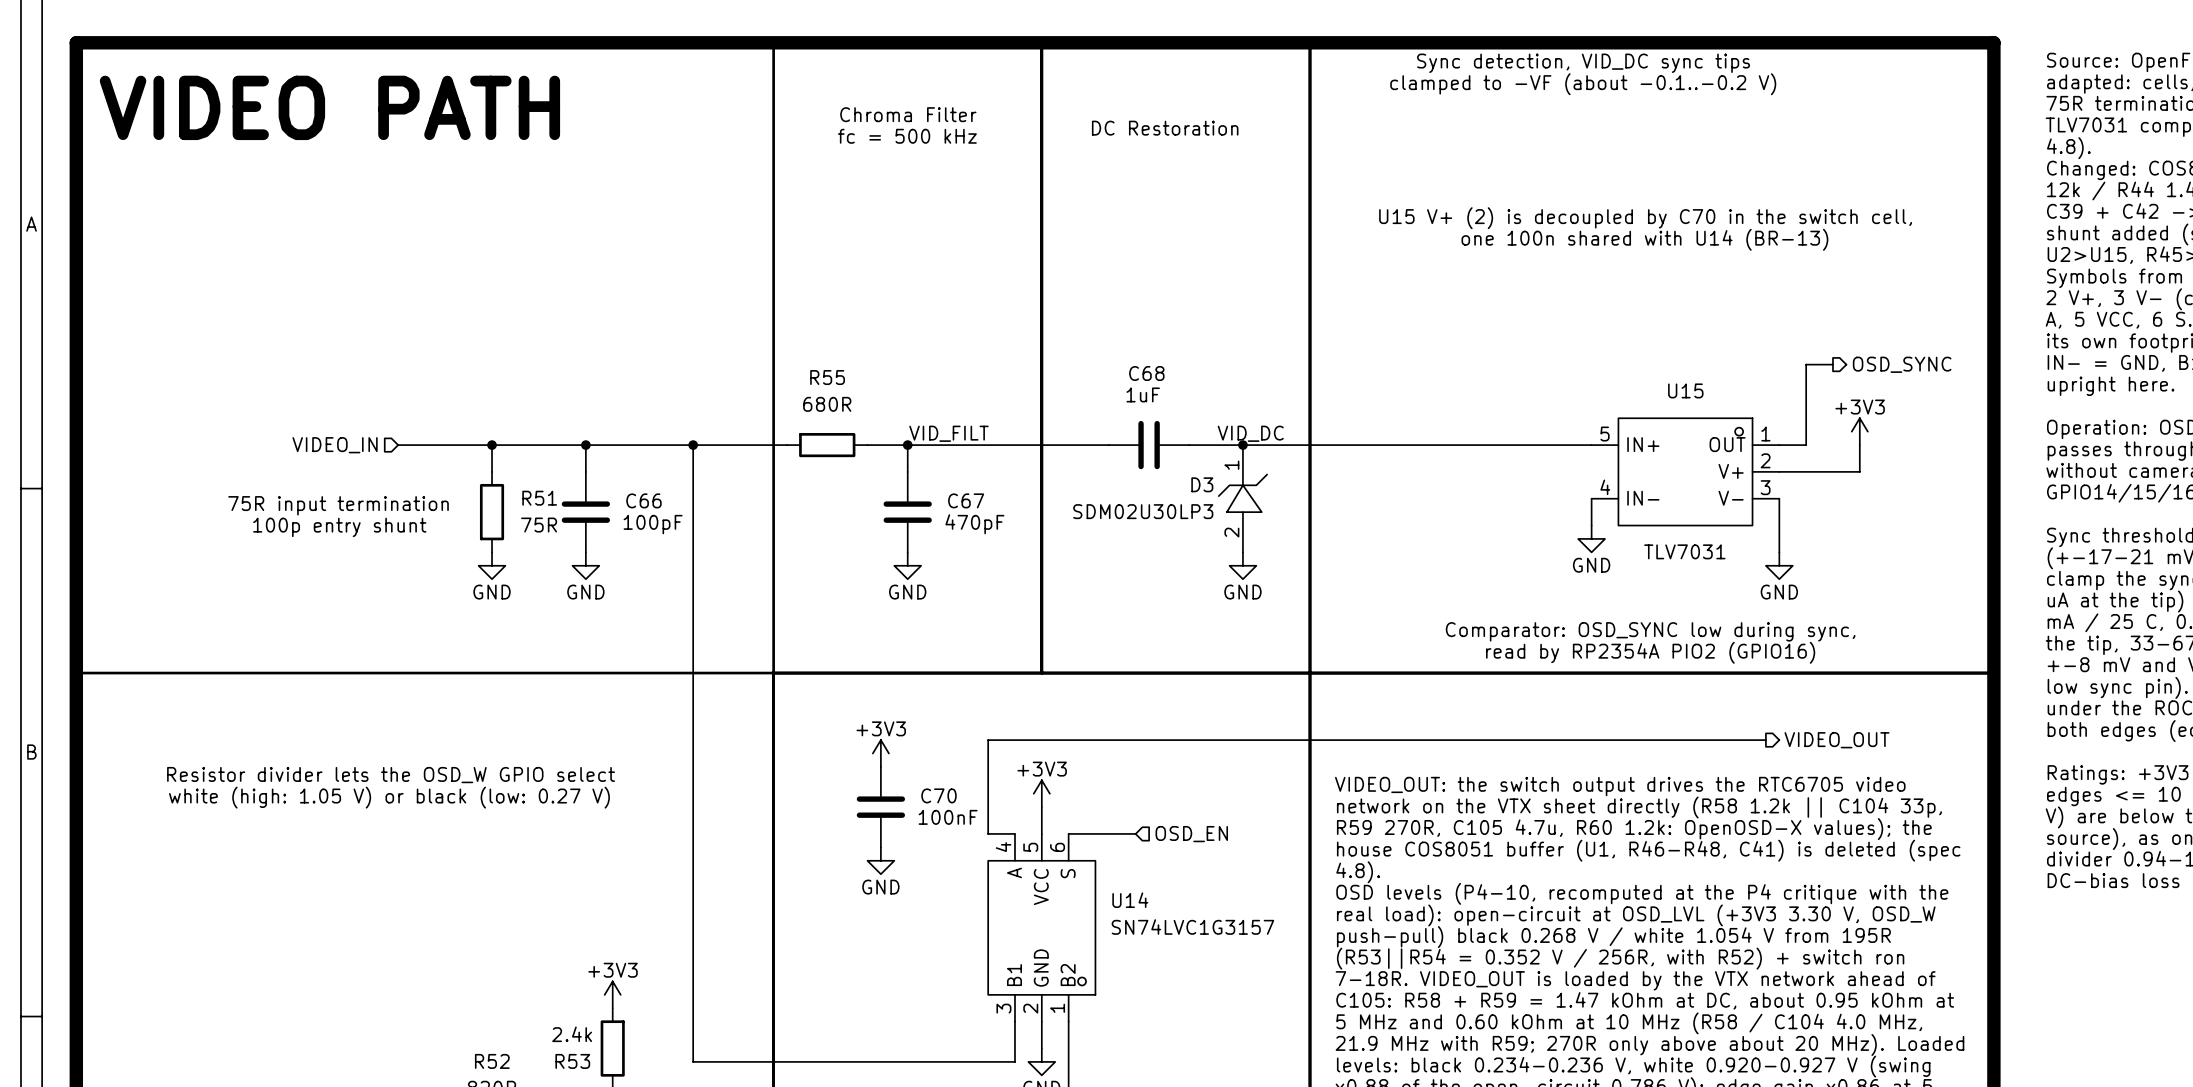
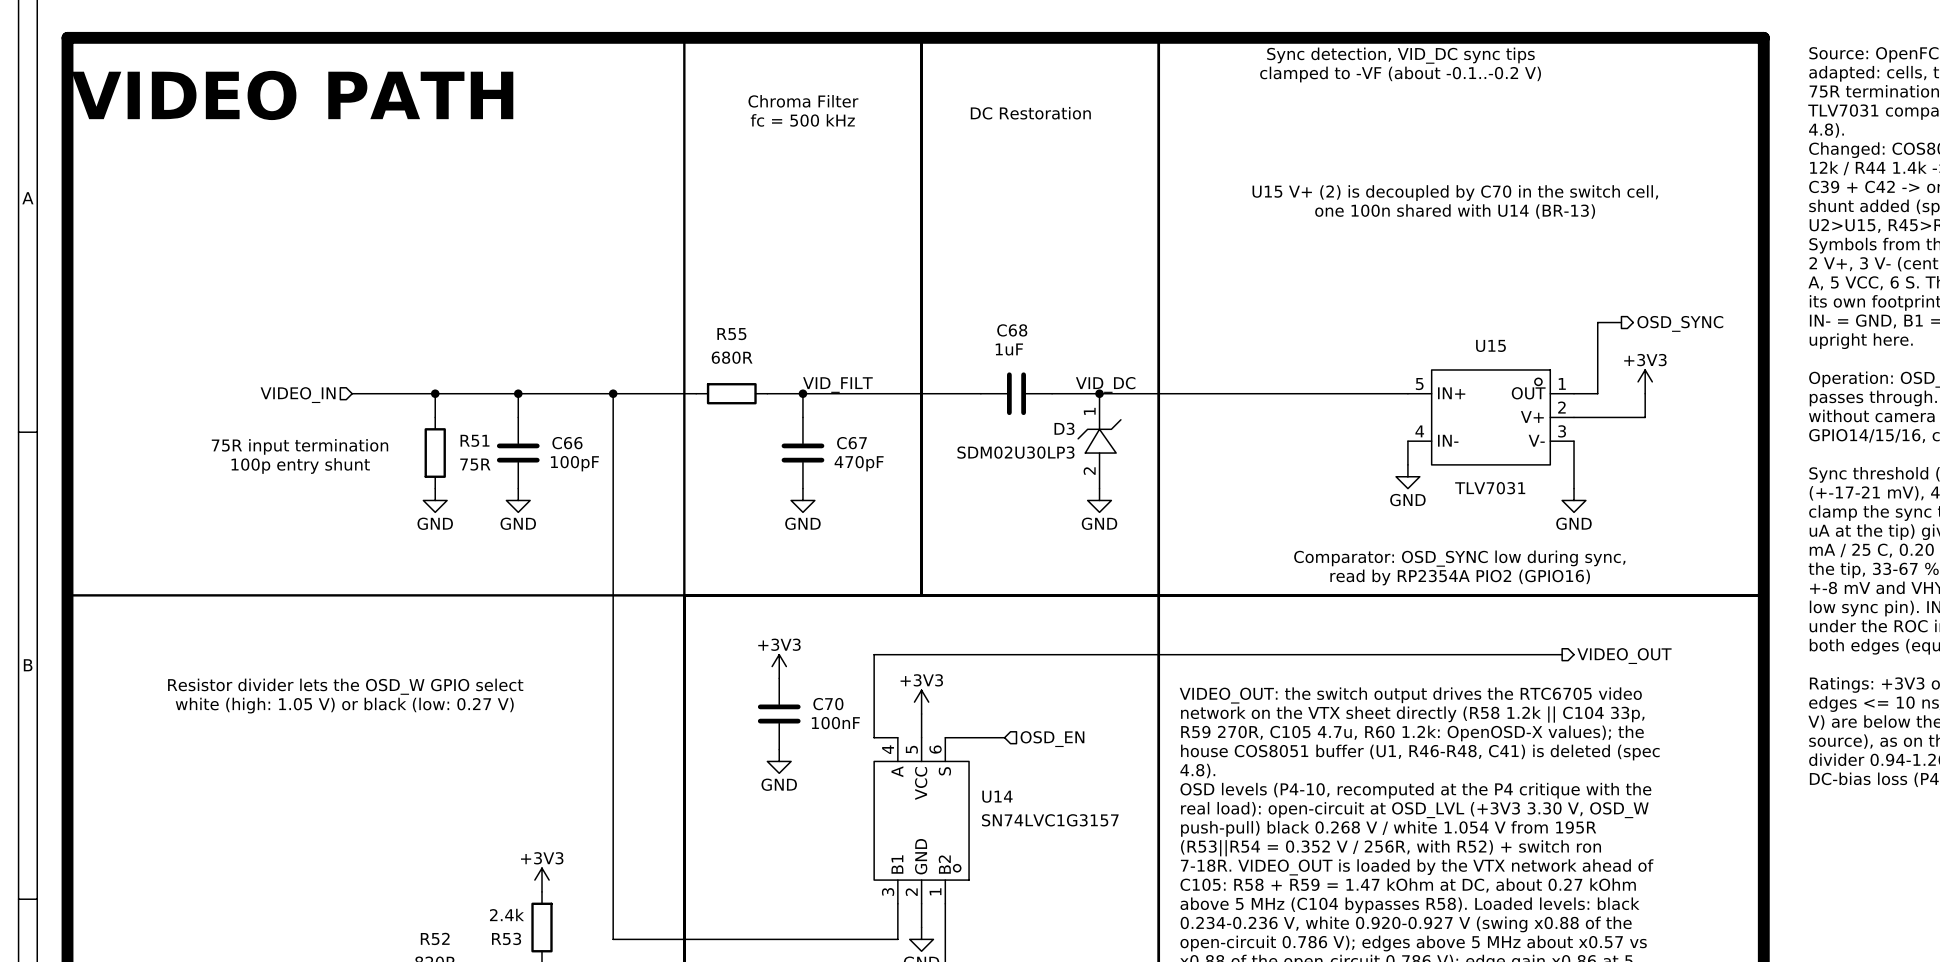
text: C105: R58 + R59 = 1.47 kOhm at DC, about 0.95 kOhm at (1645, 1000) -> C105: R58 + R59 = 1.47 kOhm at DC, about 0.27 kOhm (1408, 885)
text: 5 MHz and 0.60 kOhm at 10 MHz (R58 / C104 4.0 MHz, (1629, 1023) -> above 5 MHz (C104 bypasses R58). Loaded levels: black (1410, 905)
text: 21.9 MHz with R59; 270R only above about 20 MHz). Loaded (1649, 1044) -> 0.234-0.236 V, white 0.920-0.927 V (swing x0.88 of the (1406, 924)
text: levels: black 0.234-0.236 V, white 0.920-0.927 V (swing (1633, 1066) -> open-circuit 0.786 V); edges above 5 MHz about x0.57 vs (1413, 943)

